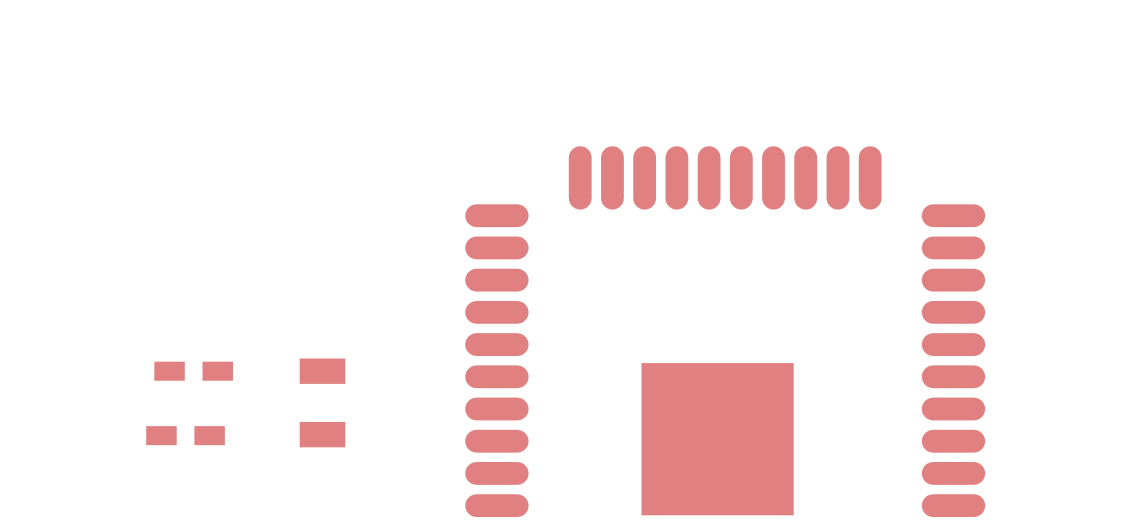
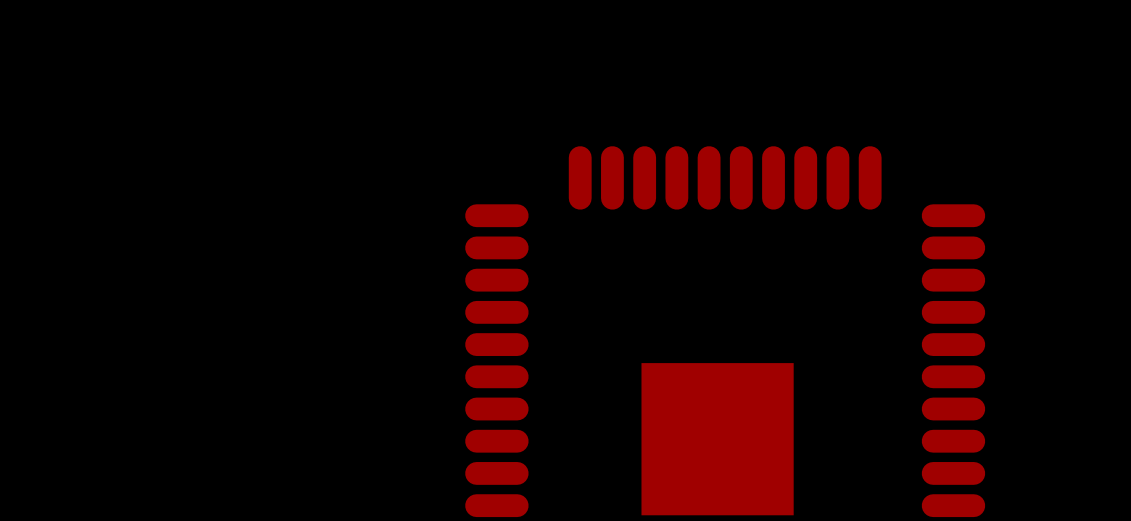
part: (193, 371) -> none
part: (322, 402) -> none
part: (185, 435) -> none

